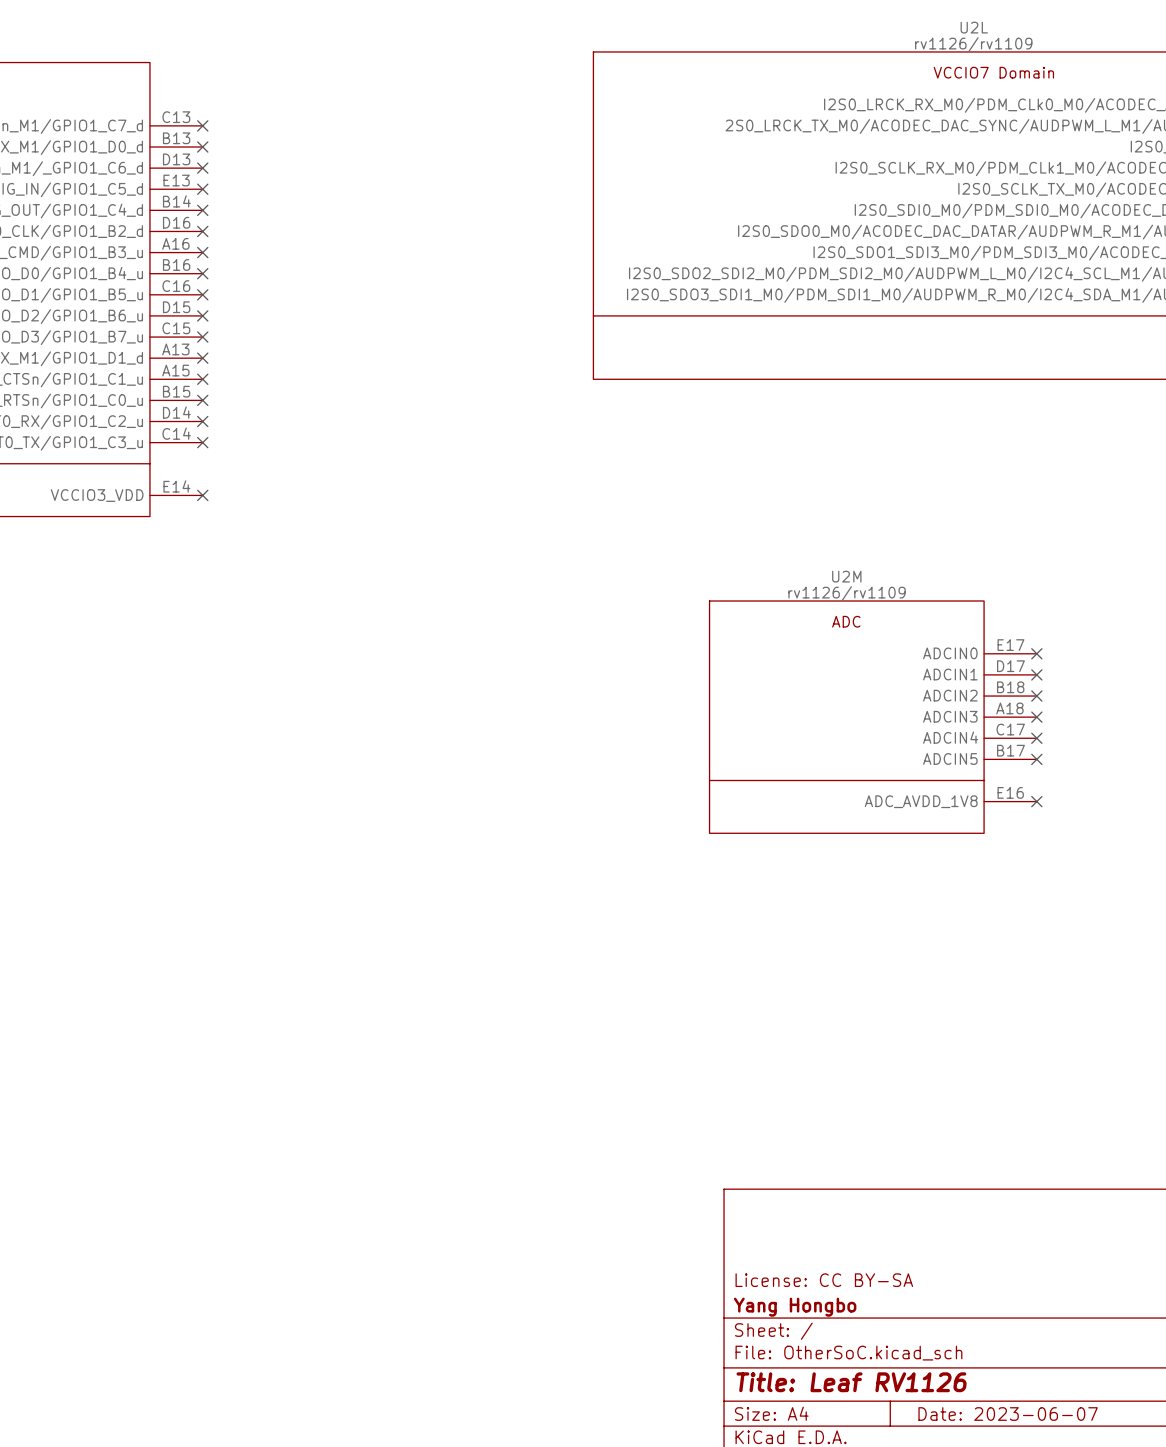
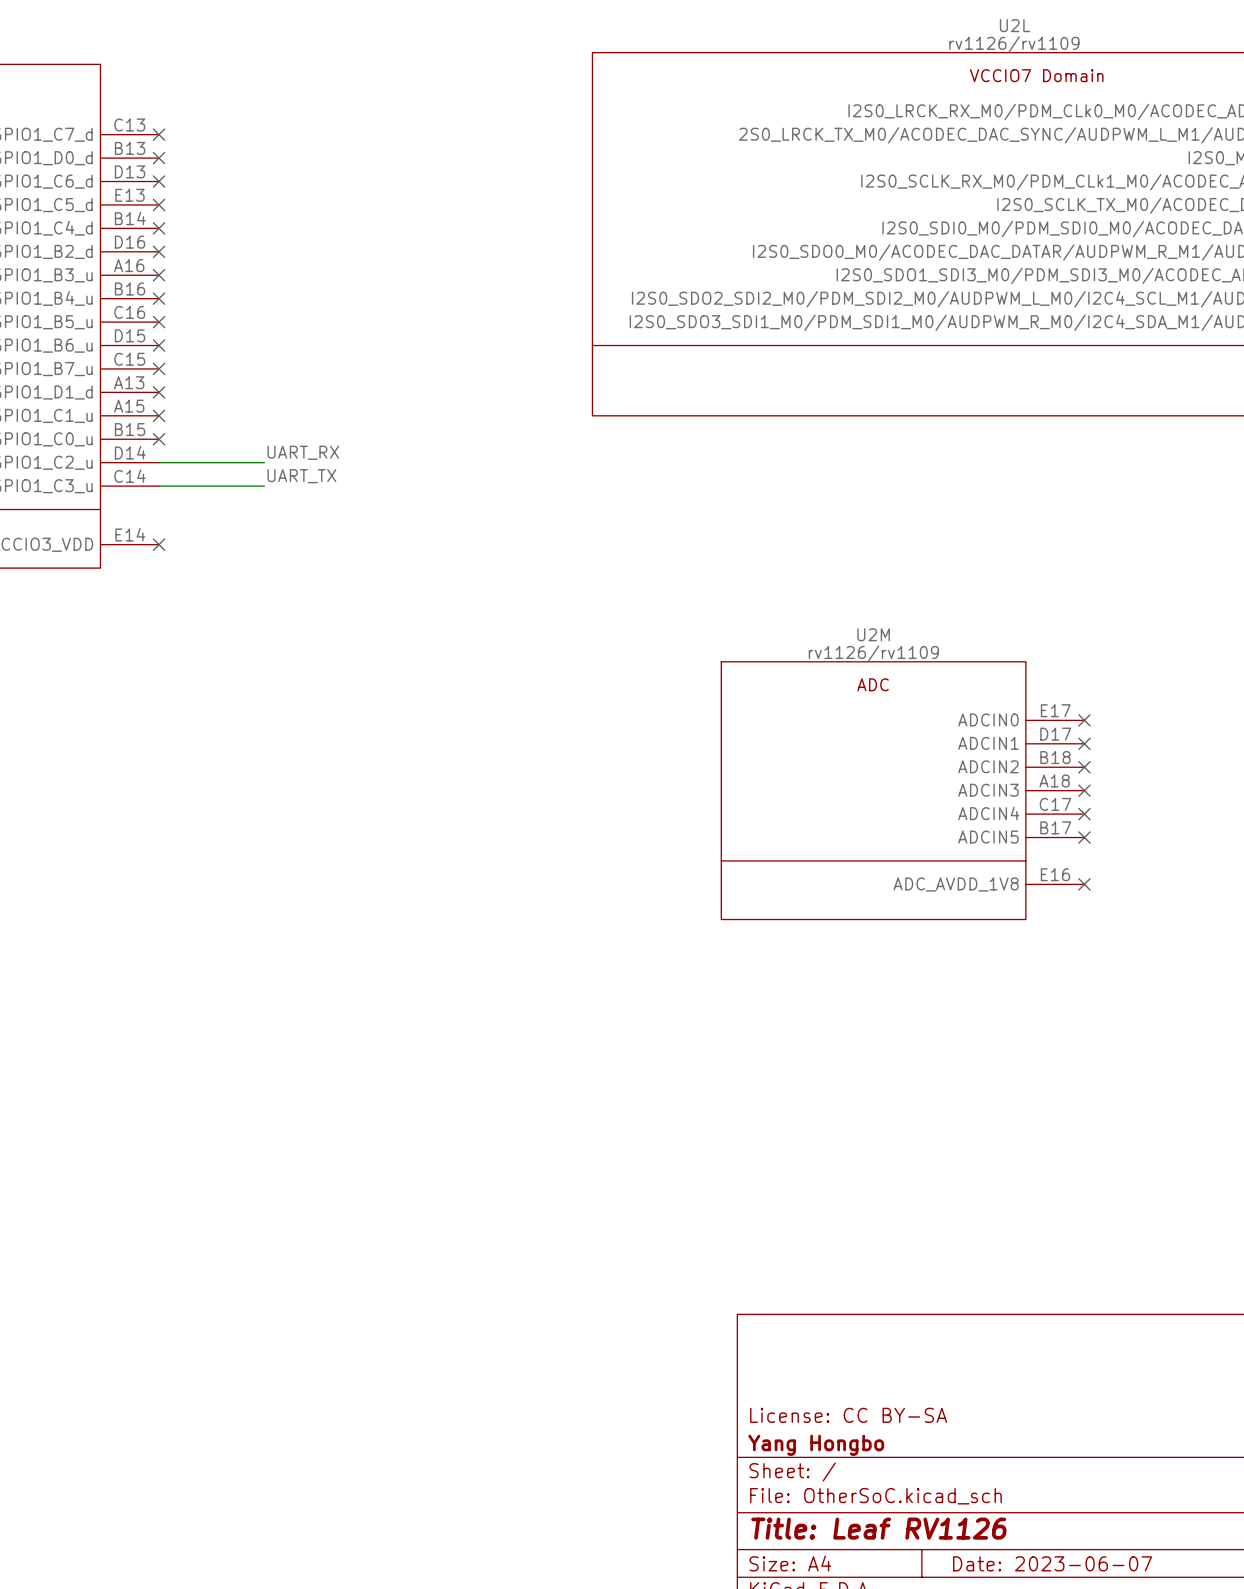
label: none -> UART_RX (303, 452)
wire: none -> (159, 462) (264, 462)
no-connect mark: (202, 421) -> none
label: none -> UART_TX (301, 476)
wire: none -> (159, 486) (264, 486)
no-connect mark: (202, 442) -> none

